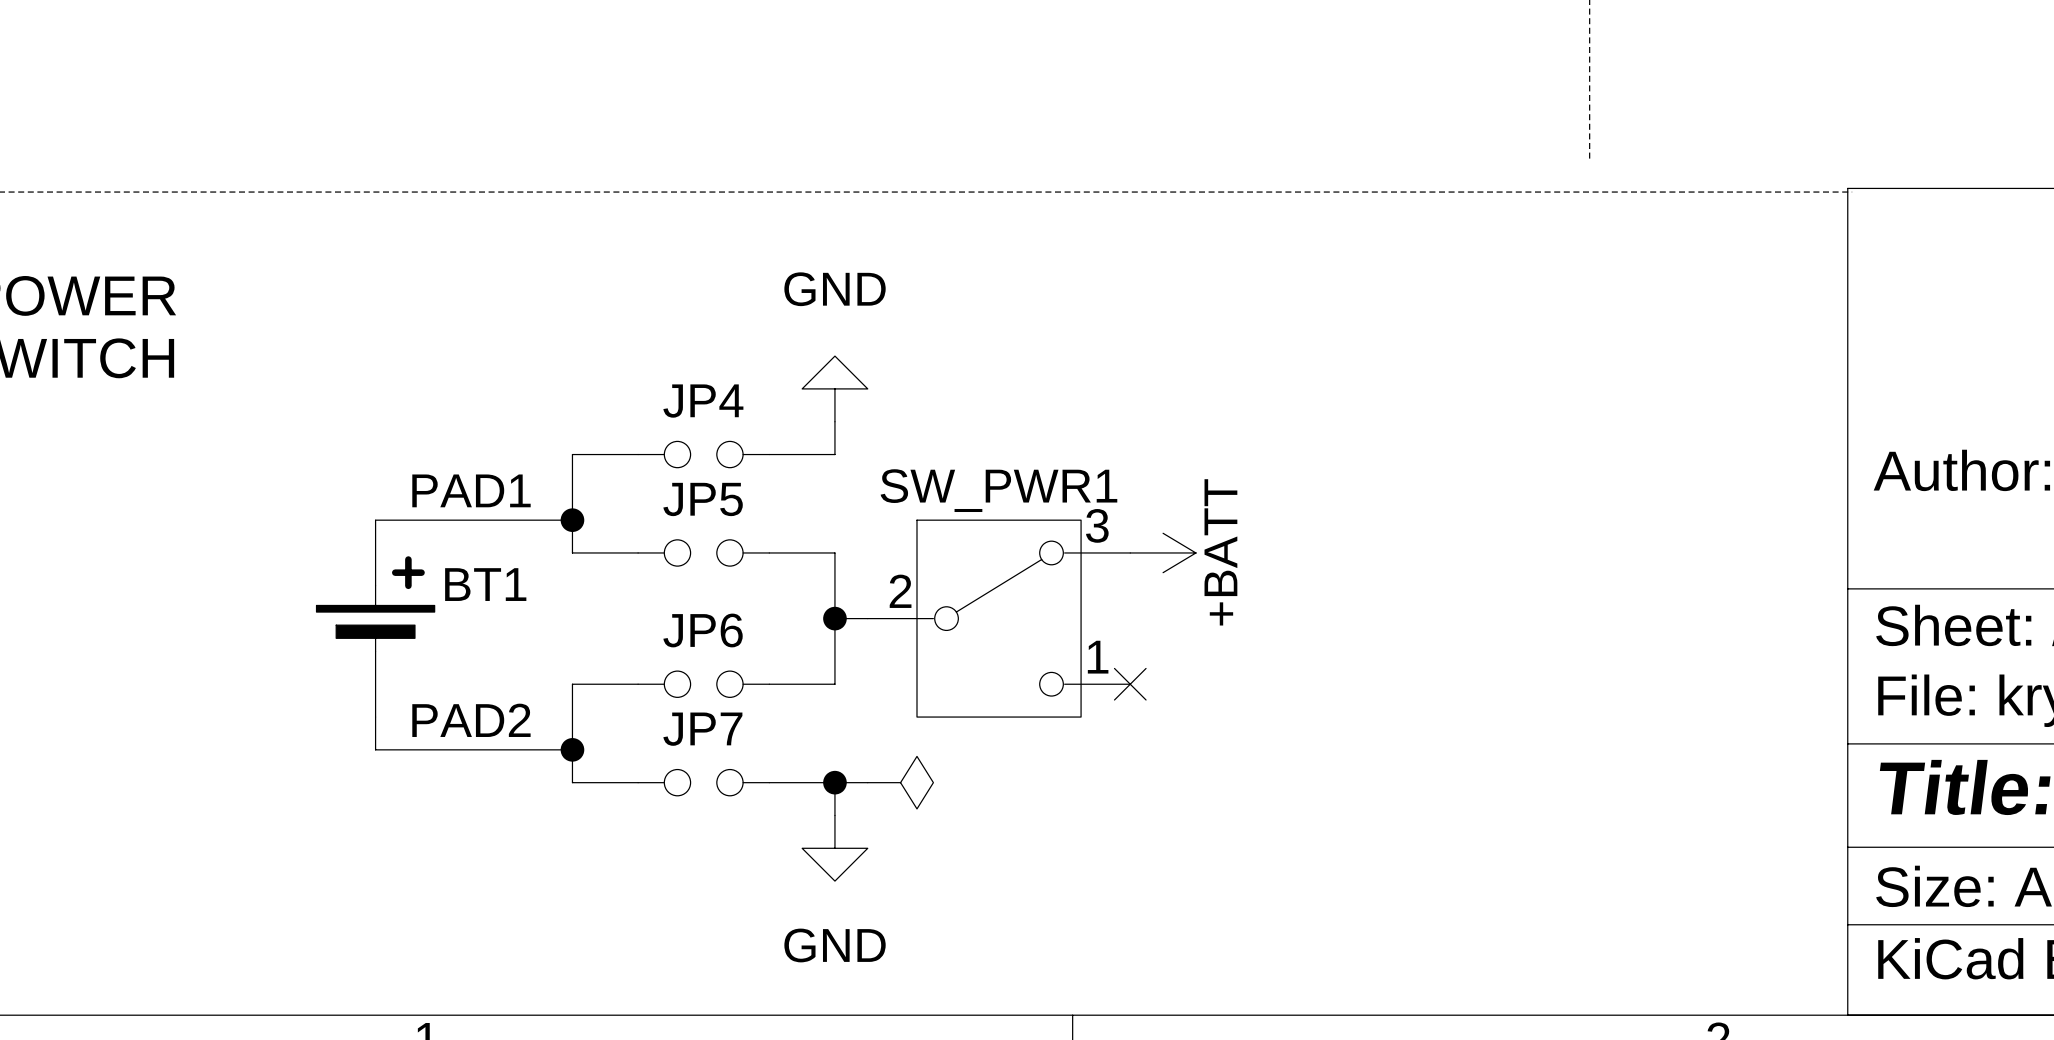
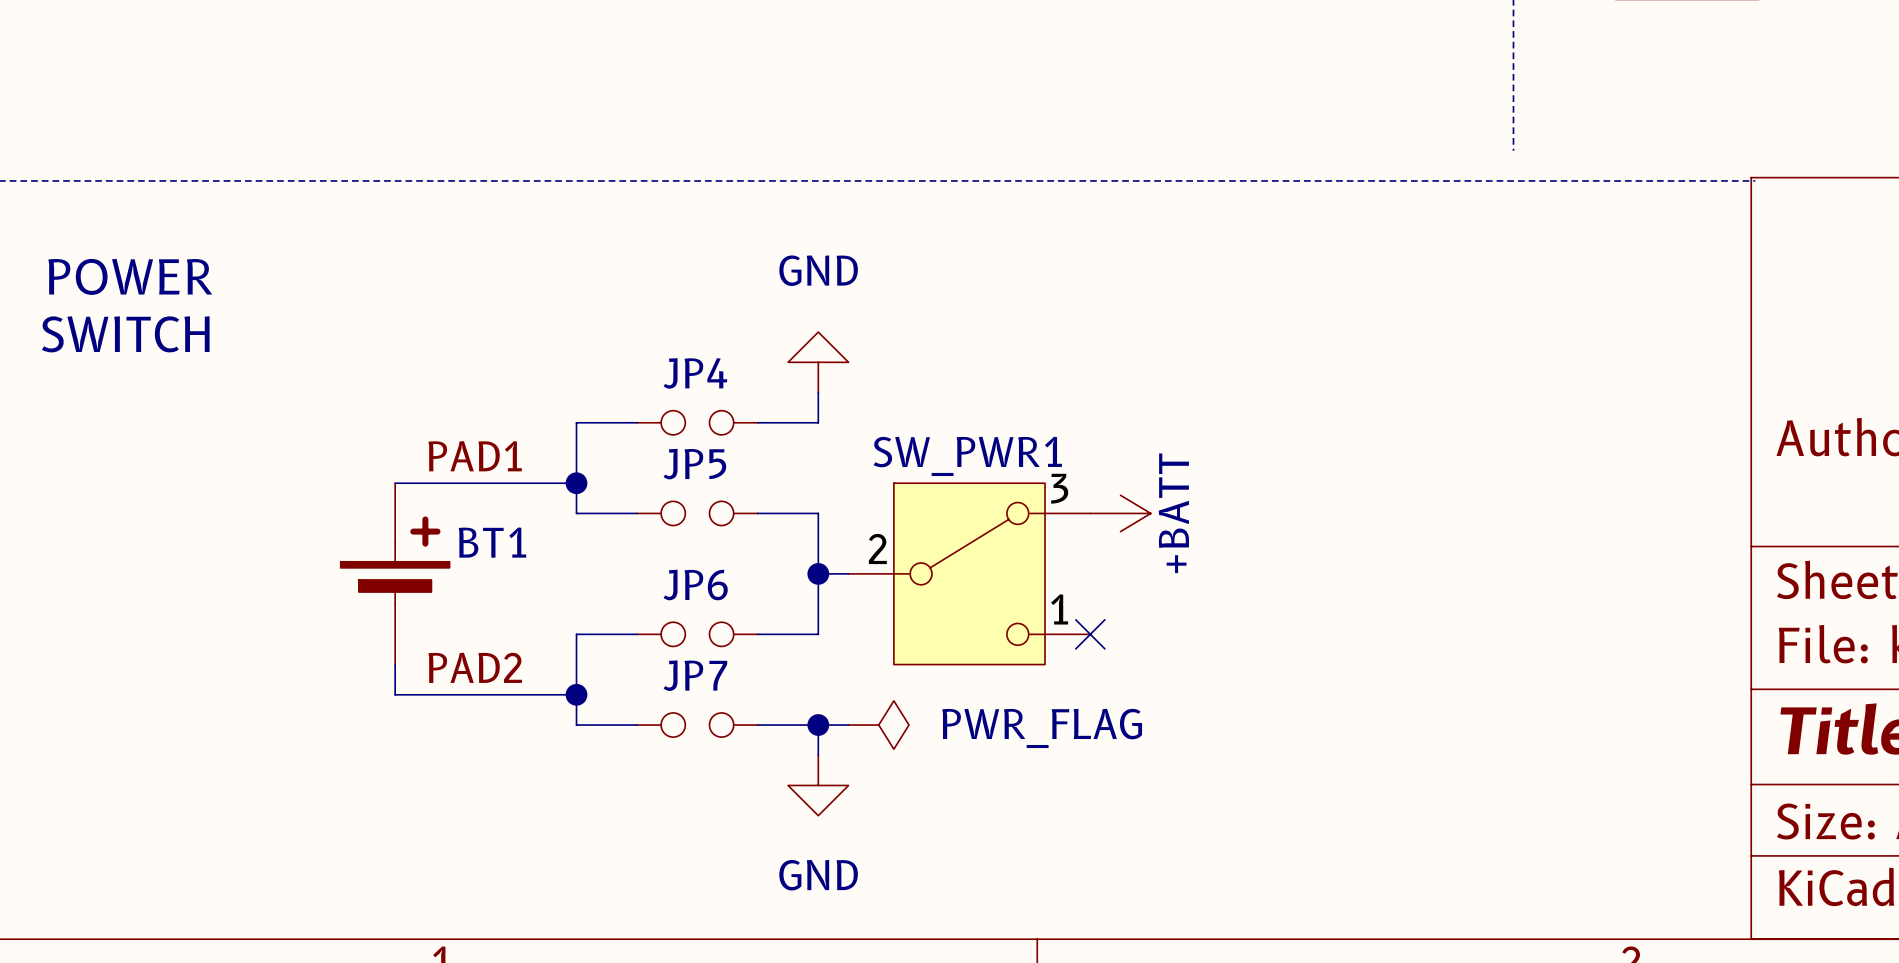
power symbol text: none -> PWR_FLAG (1042, 728)

